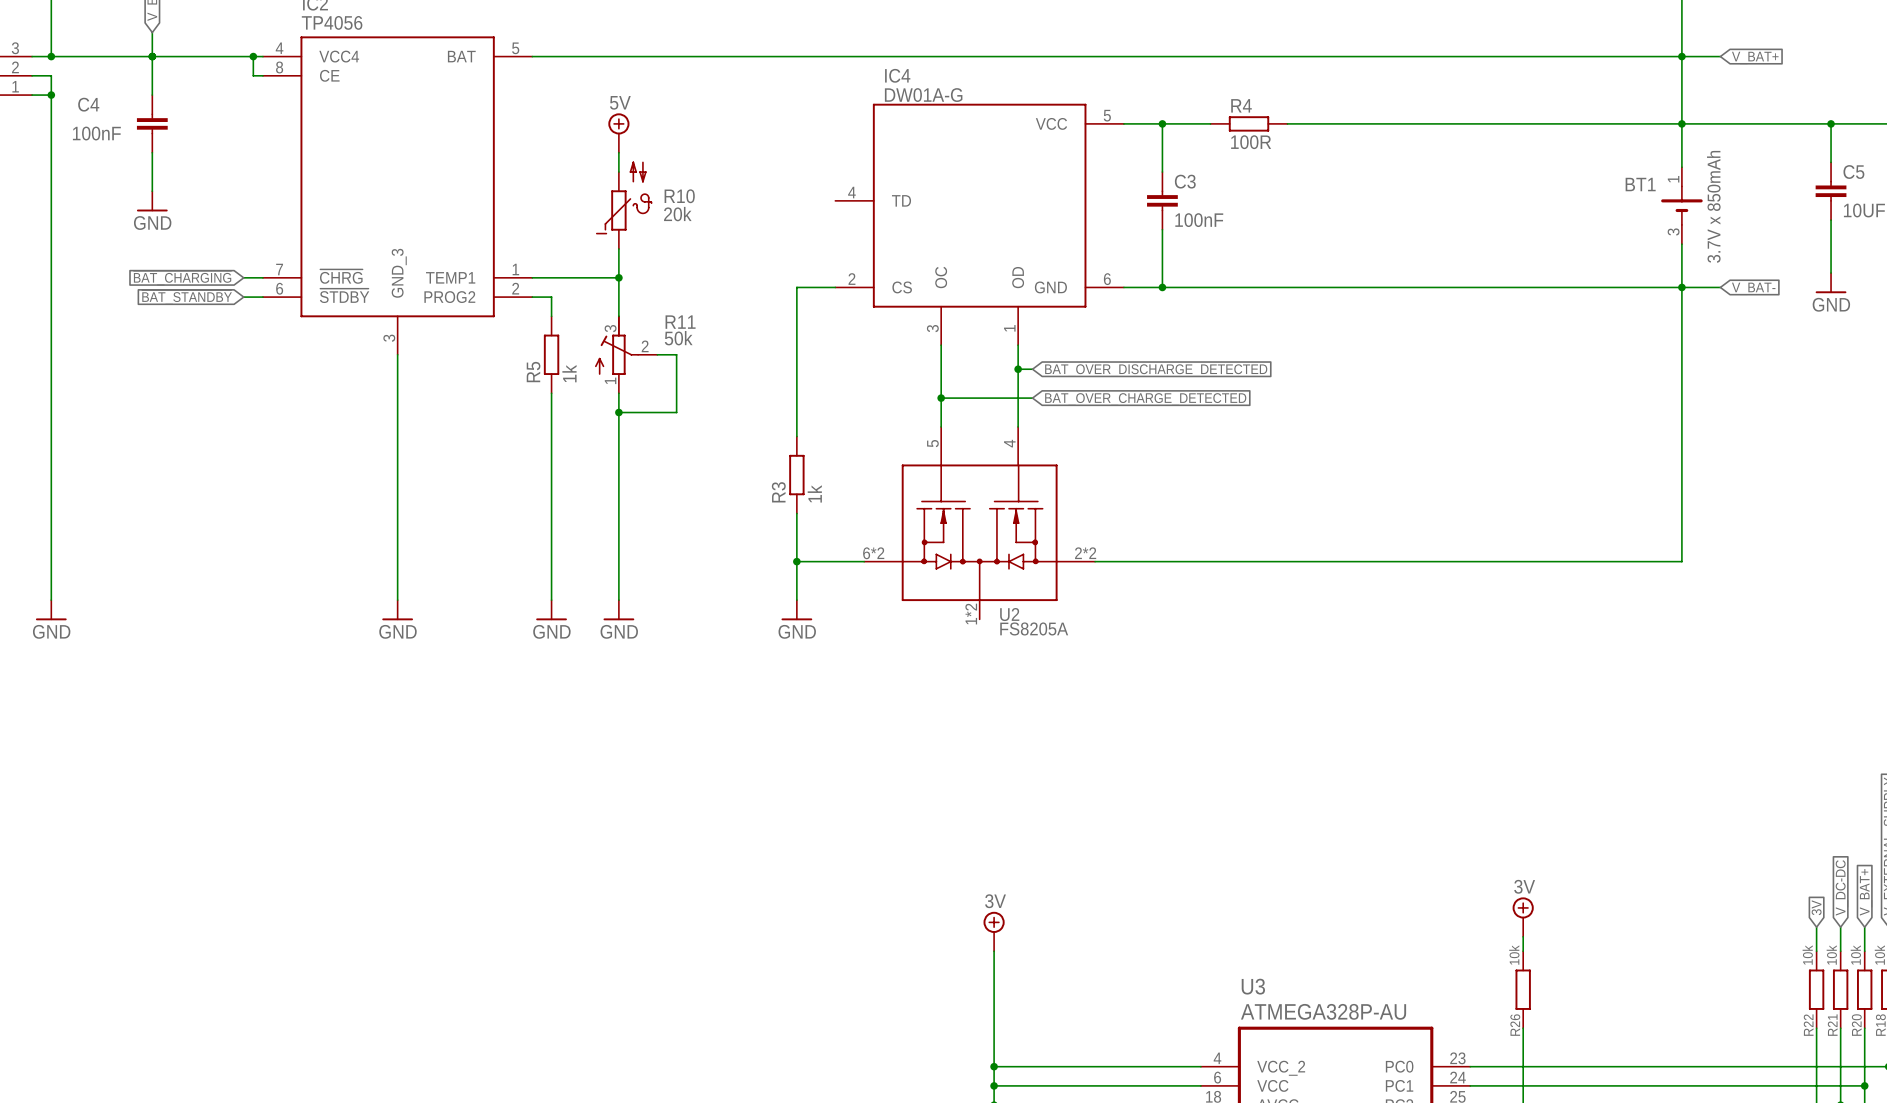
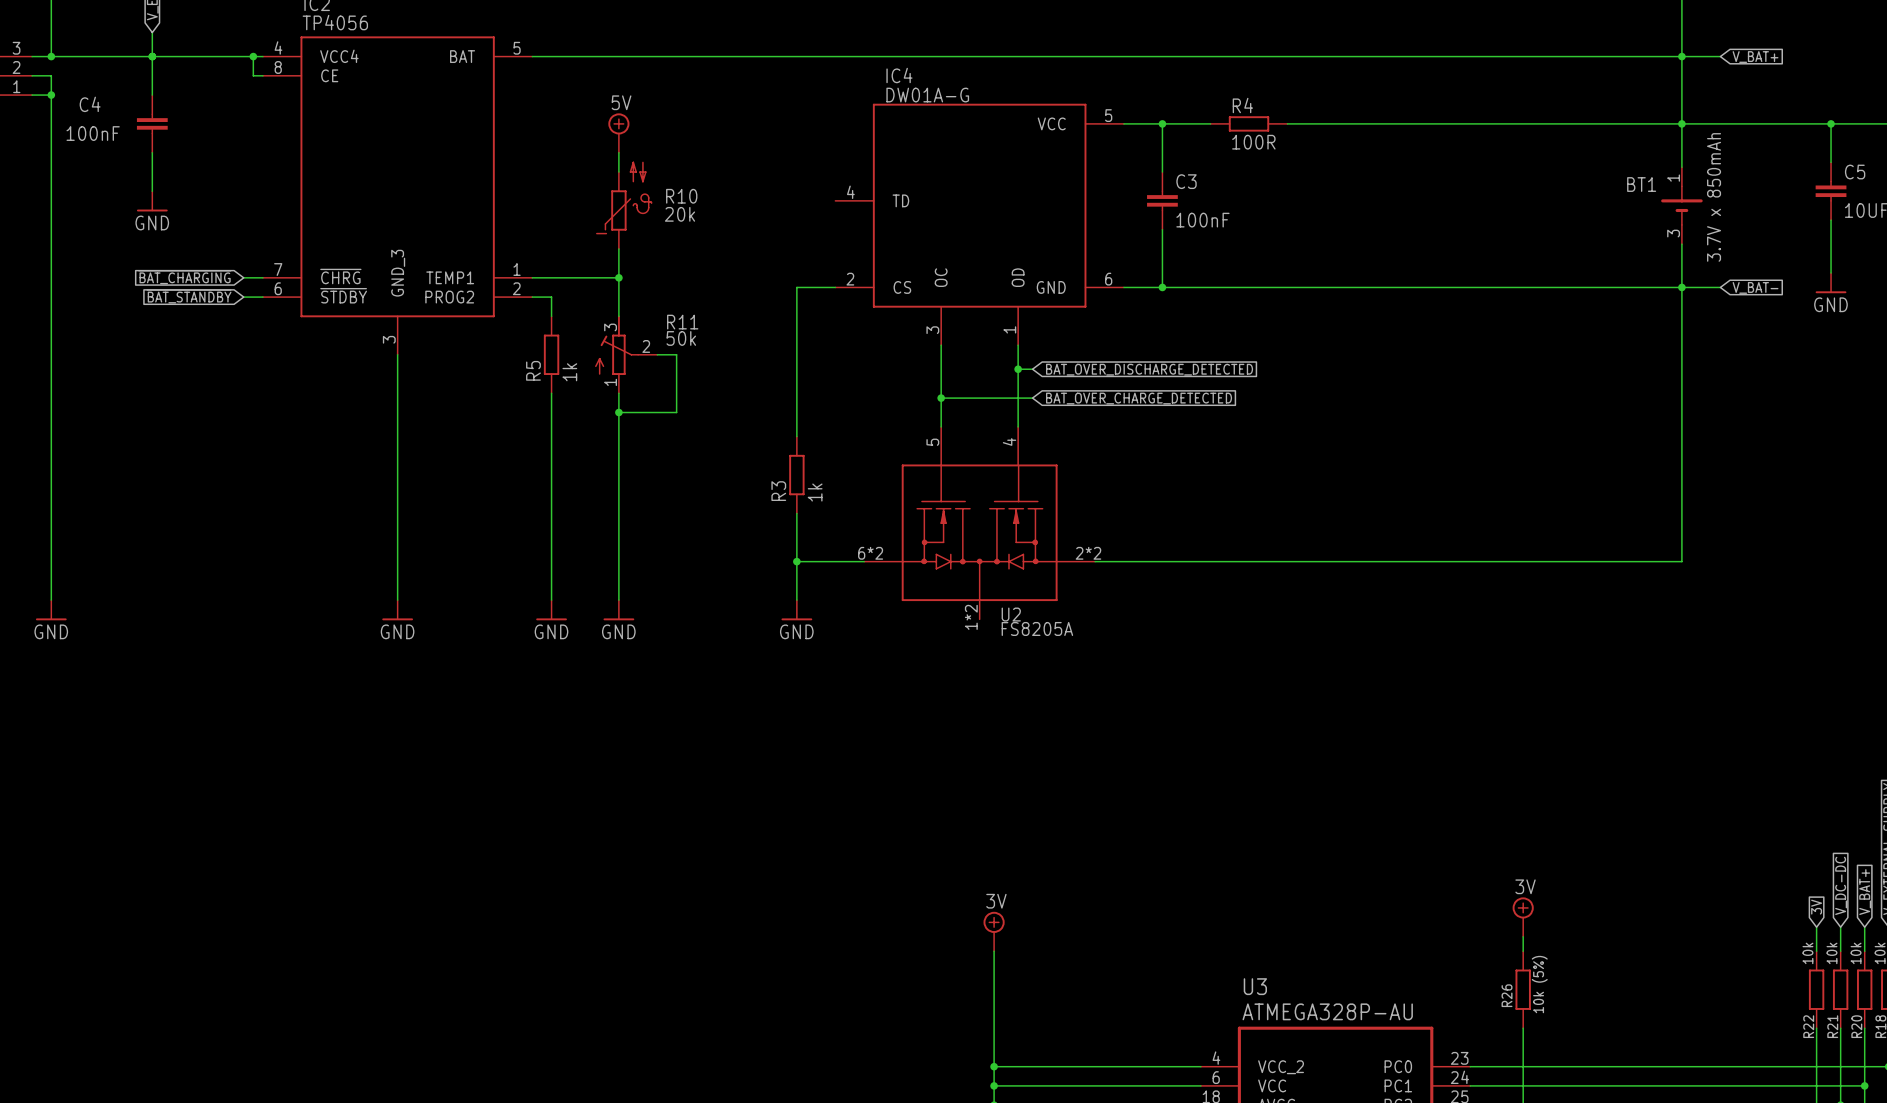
R26 value: 10k (1514, 955) -> 10k (5%) (1539, 984)
R26 name position: R26 (1515, 1025) -> R26 (1507, 995)

